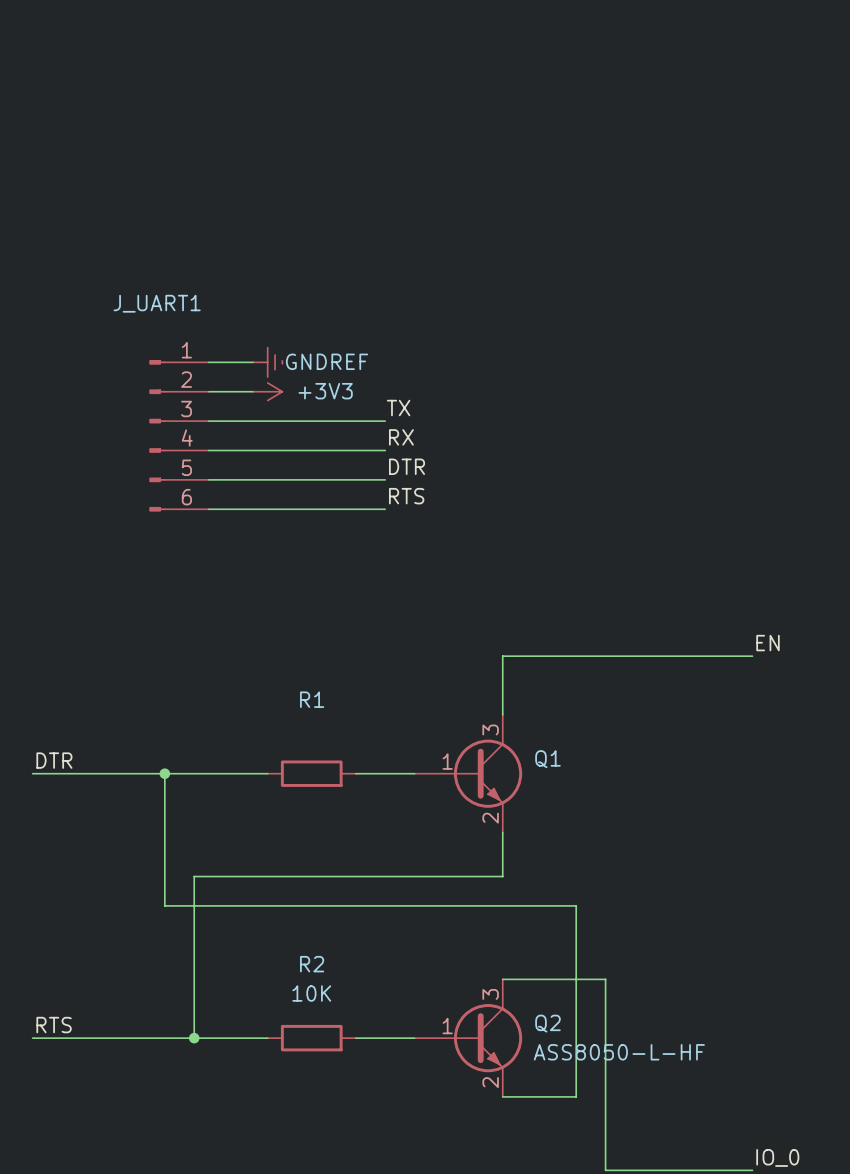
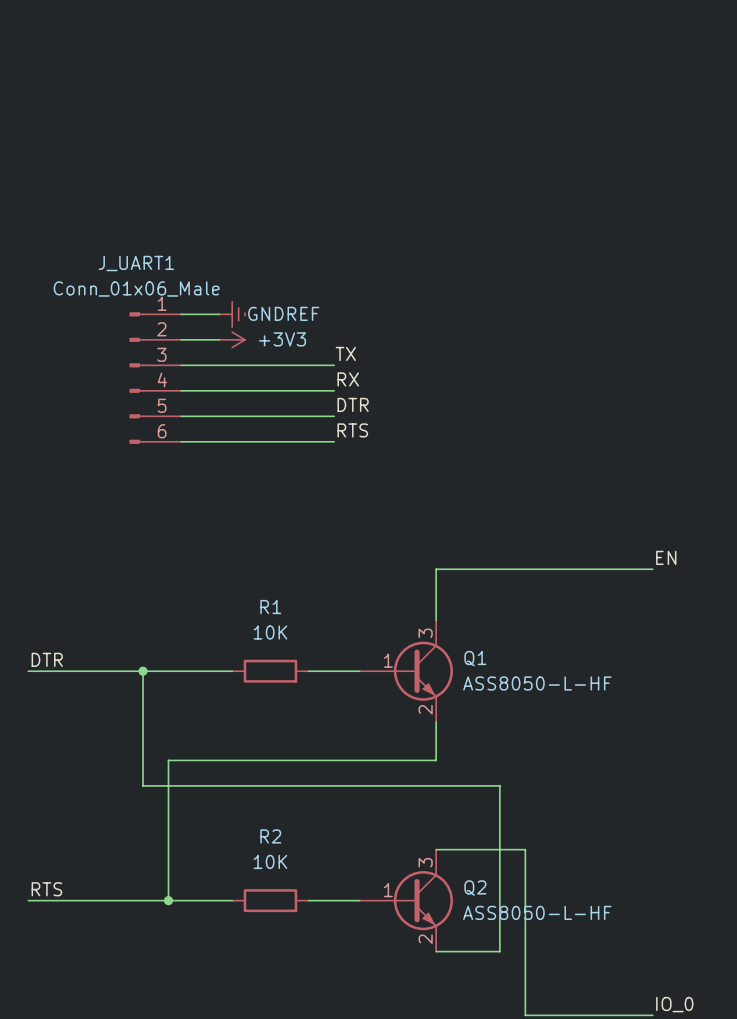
J_UART1 value: none -> Conn_01x06_Male (136, 288)
R1 value: none -> 10K (270, 632)
Q1 value: none -> ASS8050-L-HF (537, 683)

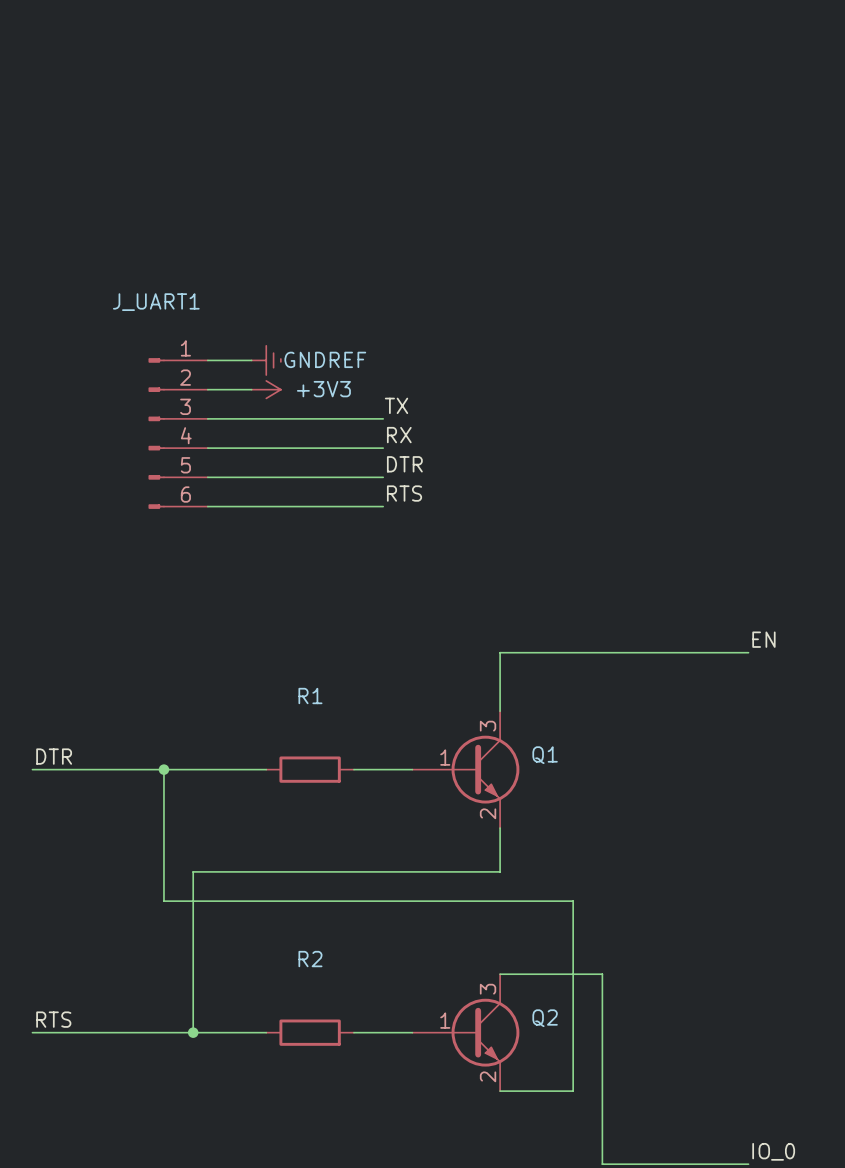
J_UART1 value: Conn_01x06_Male (136, 288) -> none
R1 value: 10K (270, 632) -> none
Q1 value: ASS8050-L-HF (537, 683) -> none
R2 value: 10K (270, 861) -> none
Q2 value: ASS8050-L-HF (537, 912) -> none

